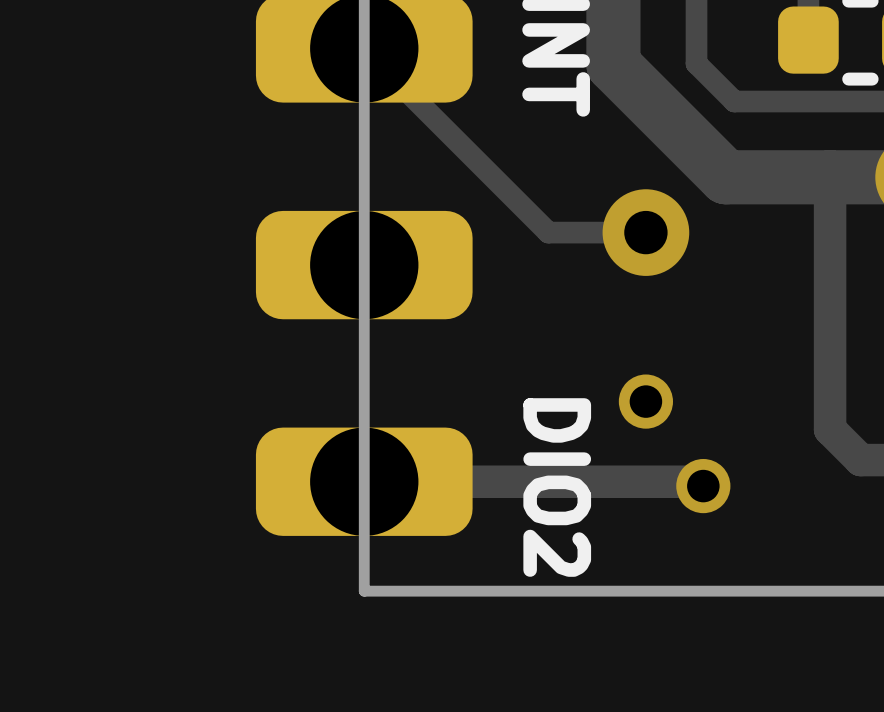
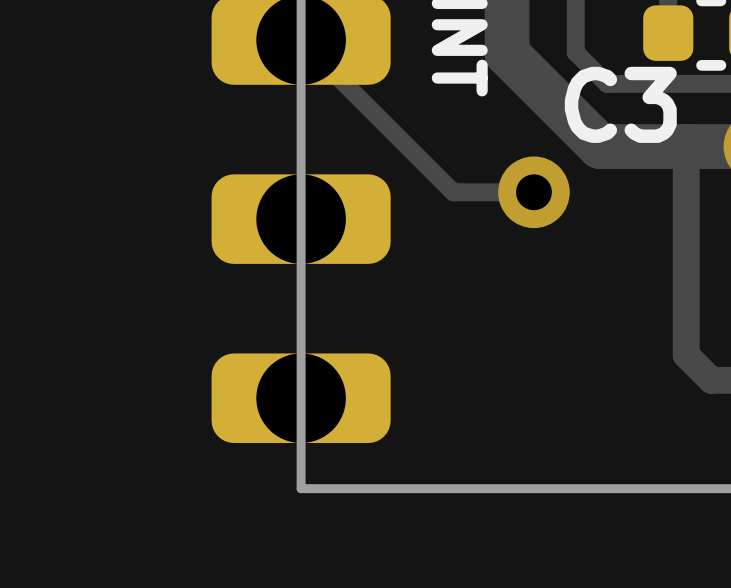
C3 name: none -> C3 (620, 104)
via: (645, 401) -> none
track: (364, 481) (699, 481) (703, 486) -> none
via: (703, 486) -> none
text: DIO2 (557, 487) -> none

